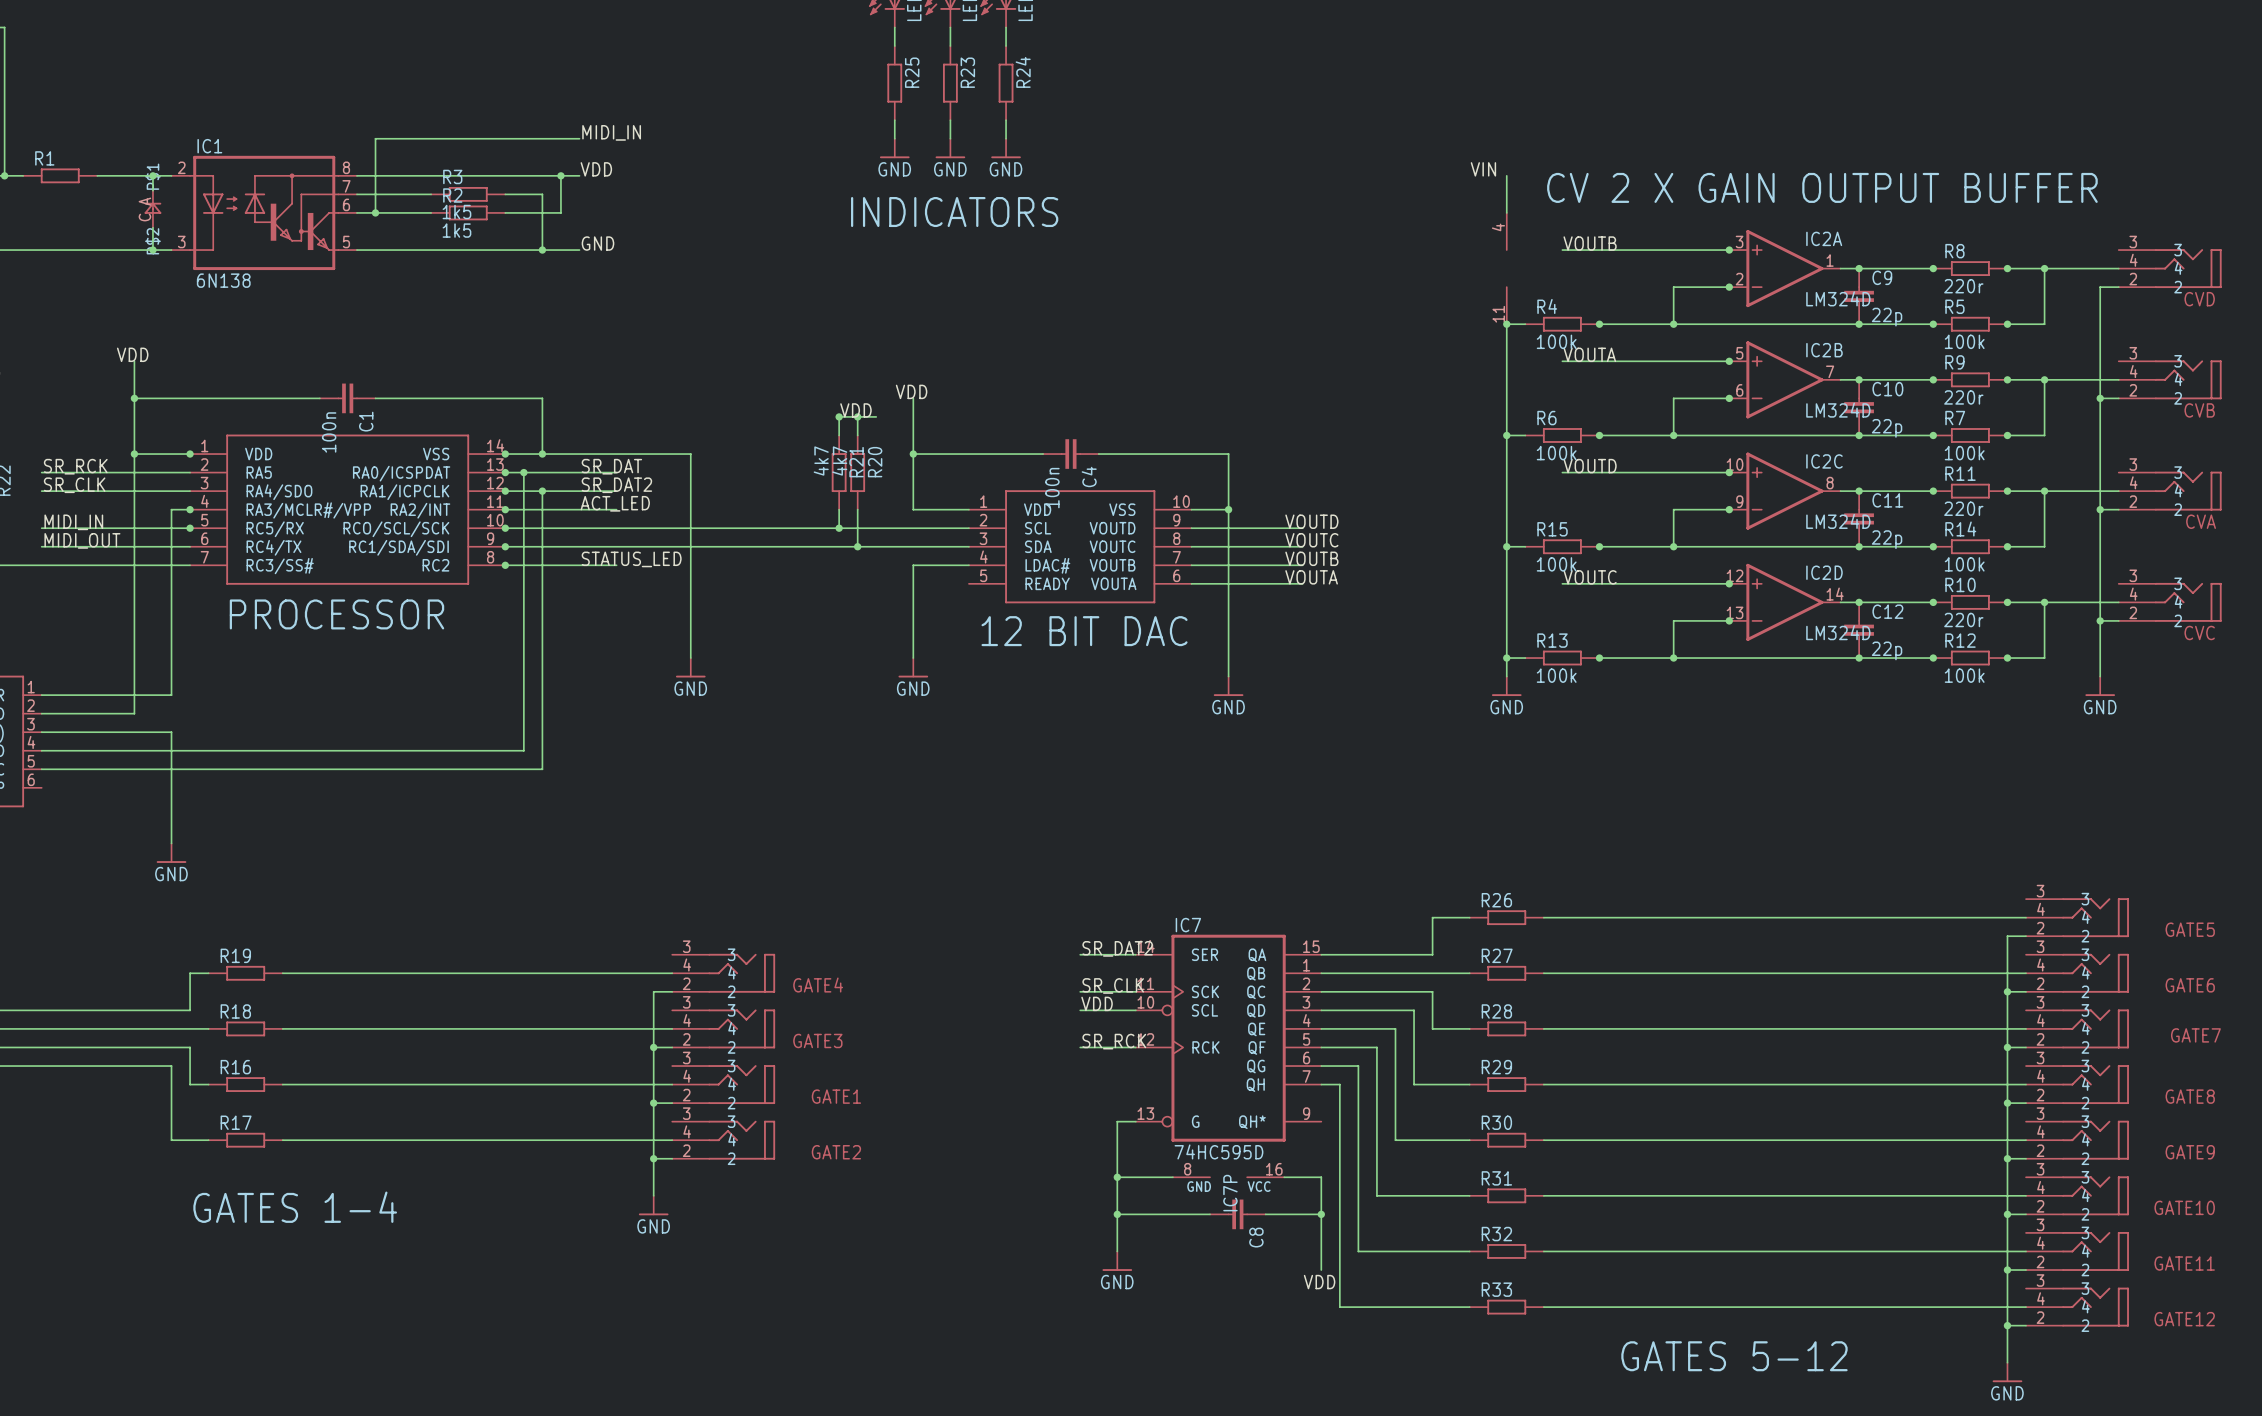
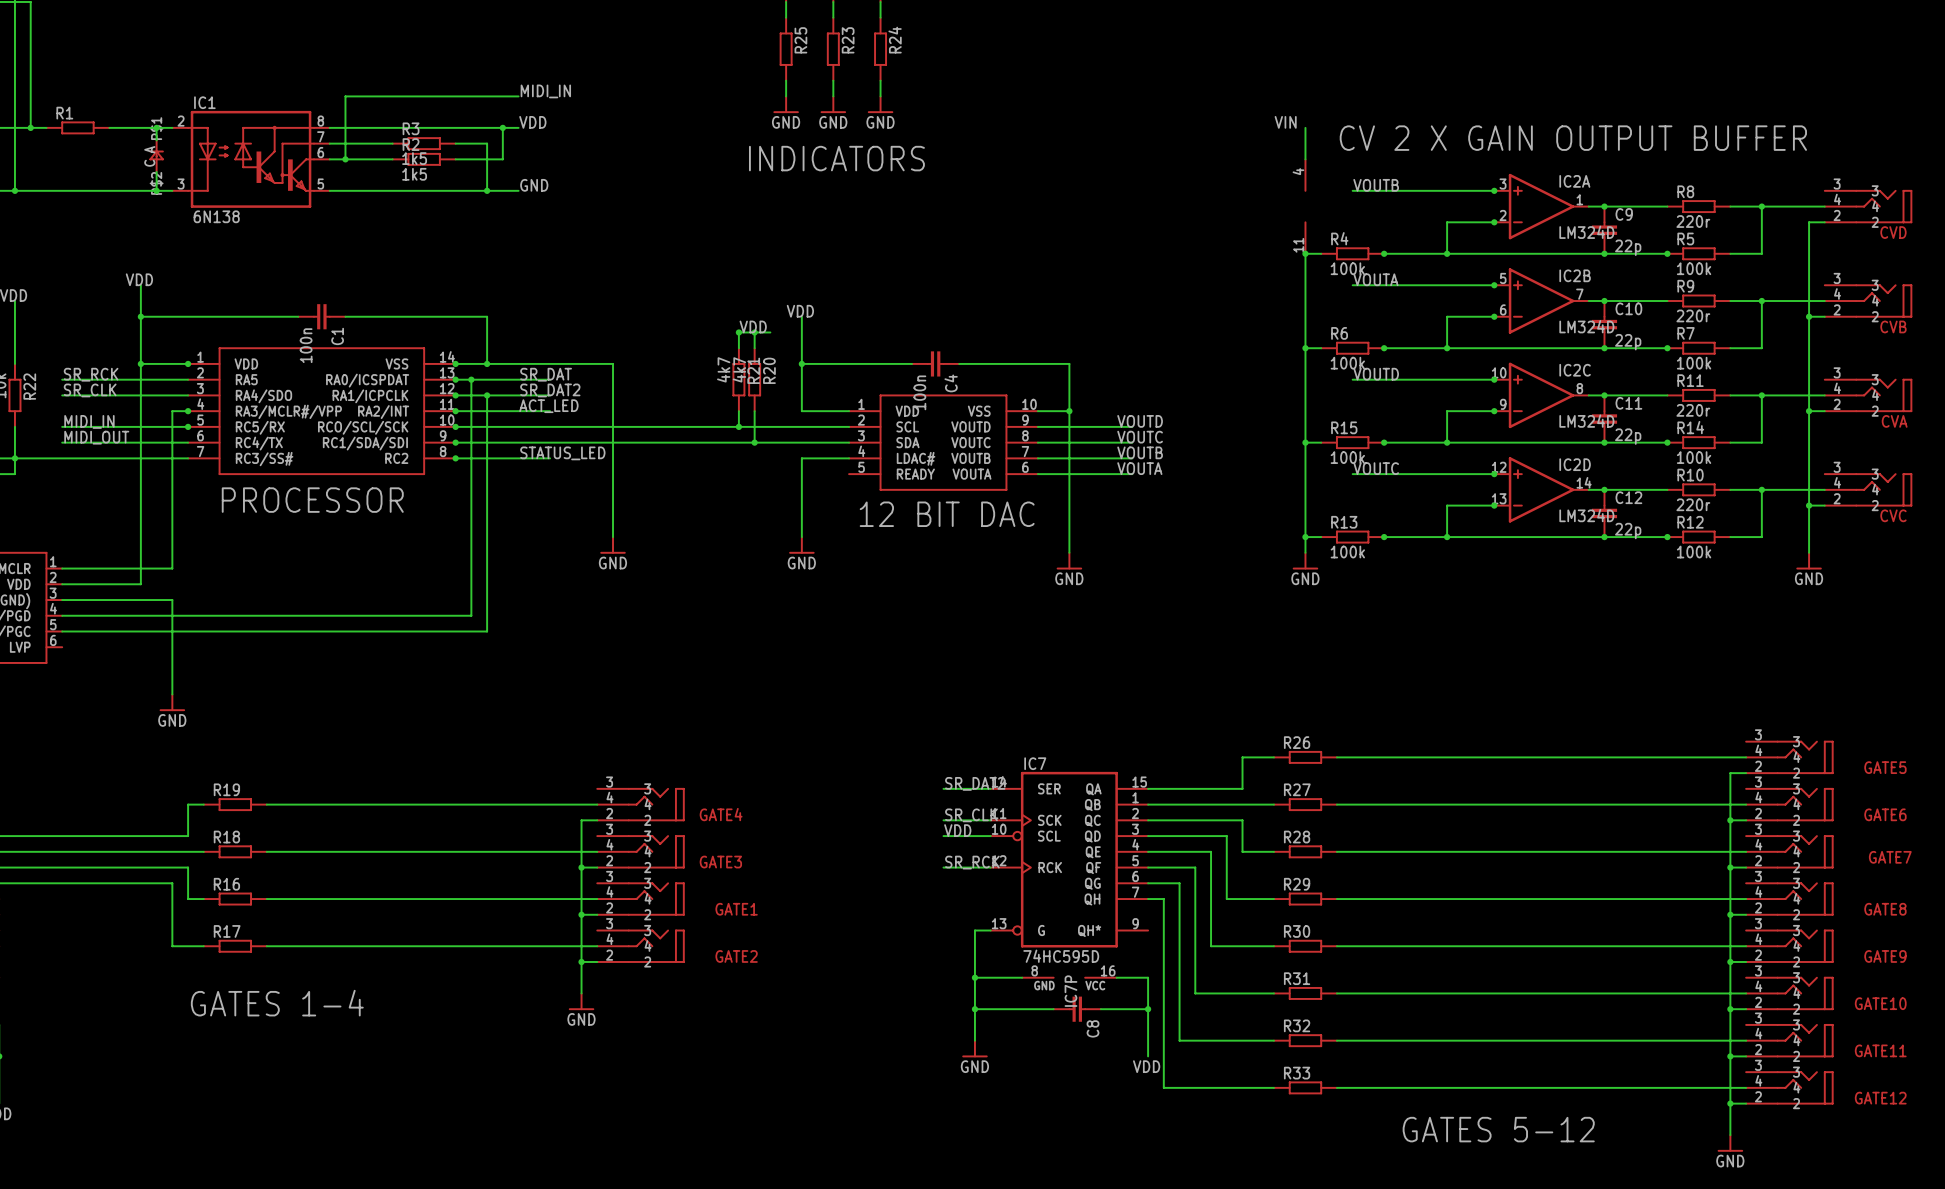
junction: (1933, 268) -> none
junction: (2007, 268) -> none
junction: (2007, 324) -> none
junction: (1933, 379) -> none
junction: (2007, 379) -> none
junction: (2007, 435) -> none
junction: (1933, 491) -> none
junction: (2007, 491) -> none
junction: (2007, 546) -> none
junction: (1933, 602) -> none
junction: (2007, 602) -> none
junction: (2007, 658) -> none

